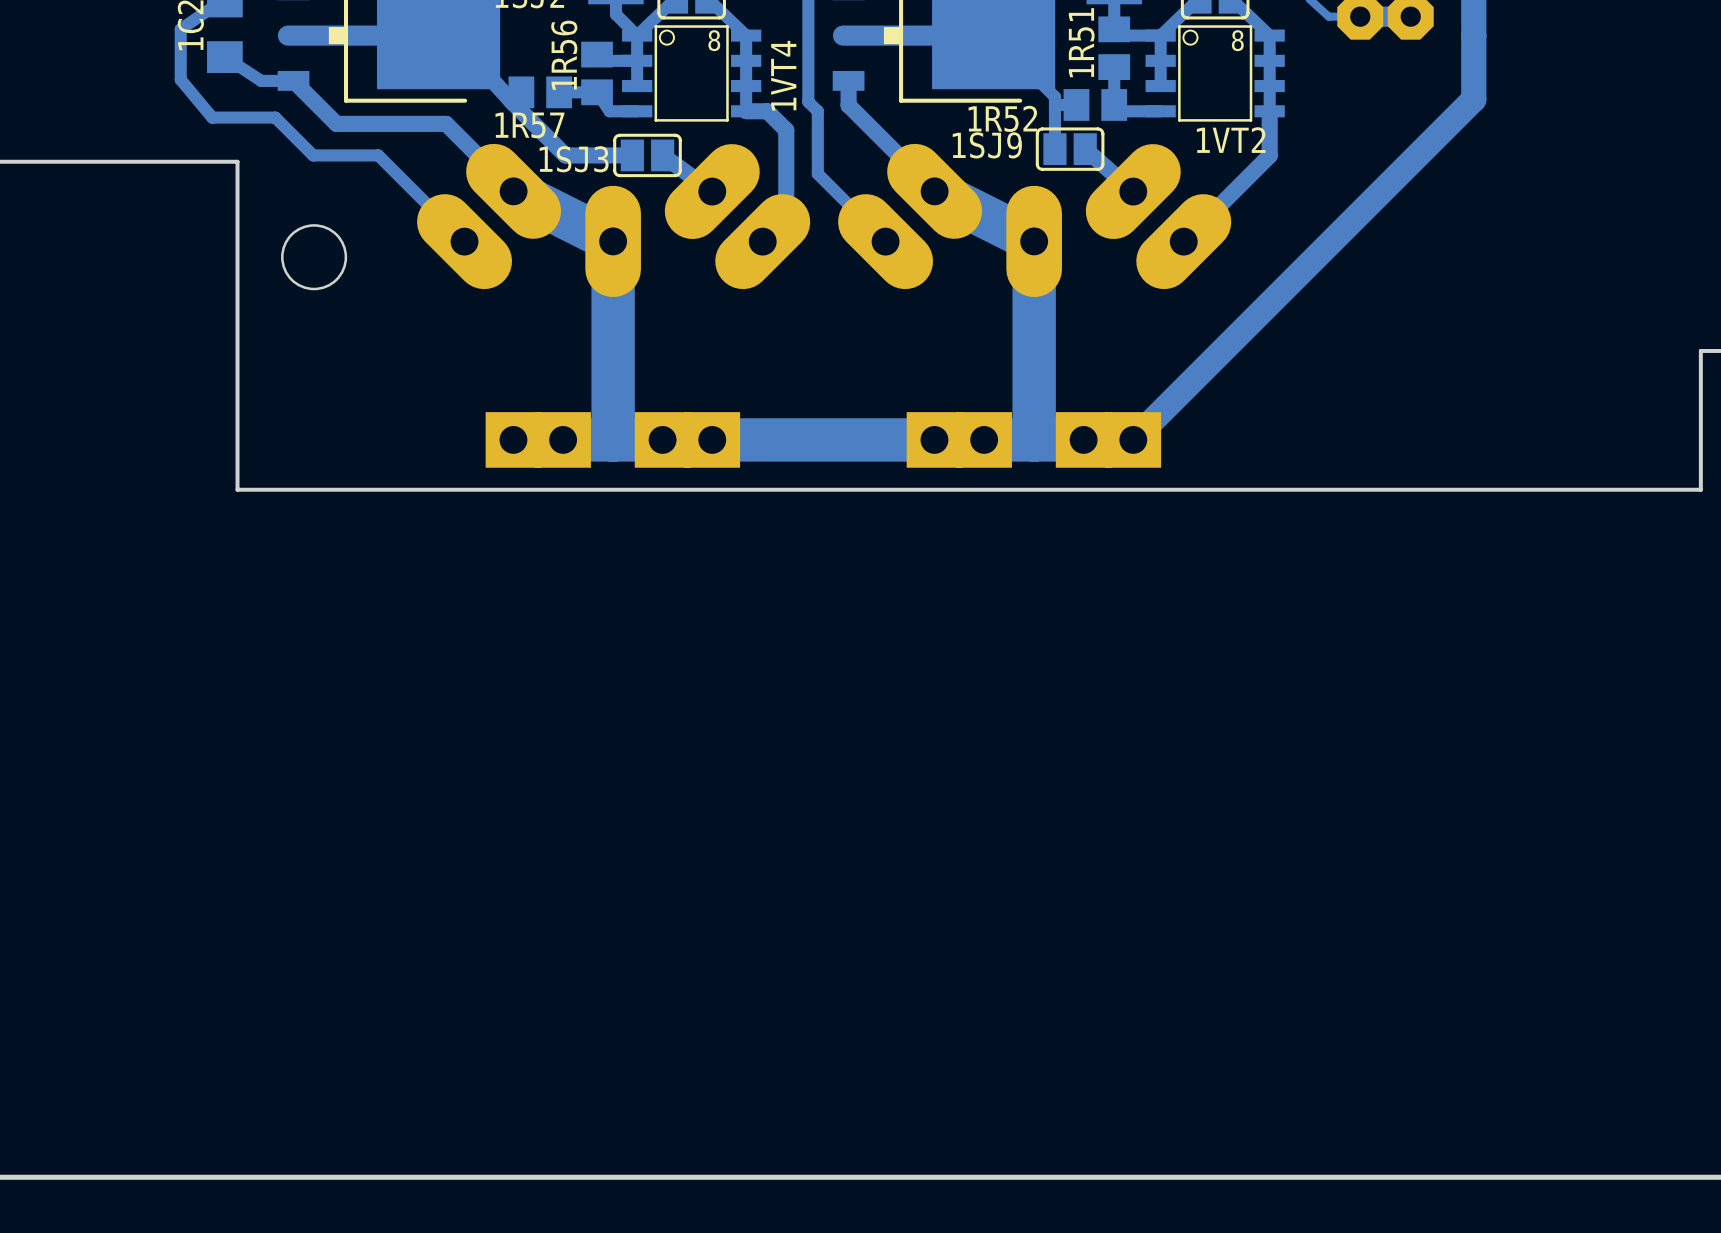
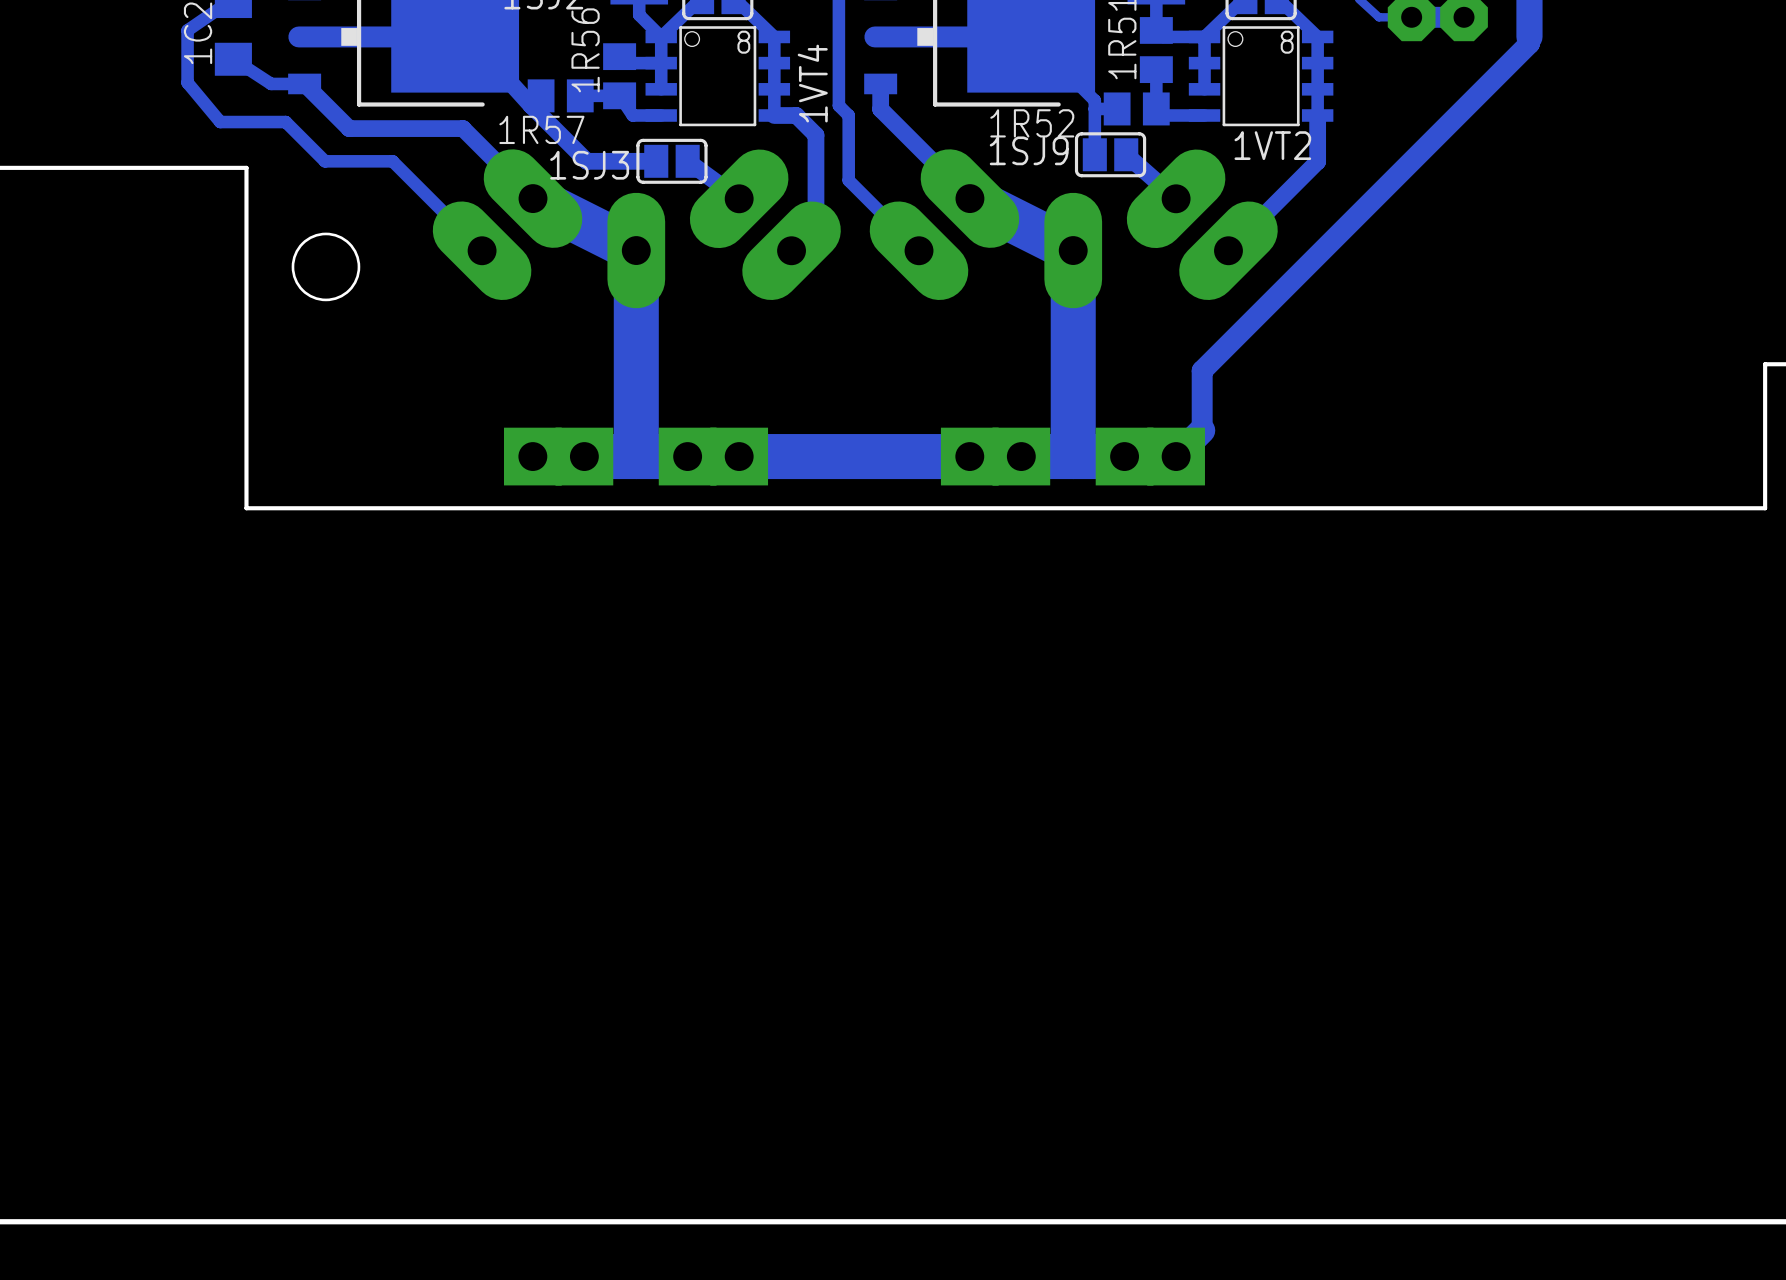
bottom track: (1473, 35) (1473, 99) (1158, 414) -> (1529, 43) (1202, 370) (1202, 430)

